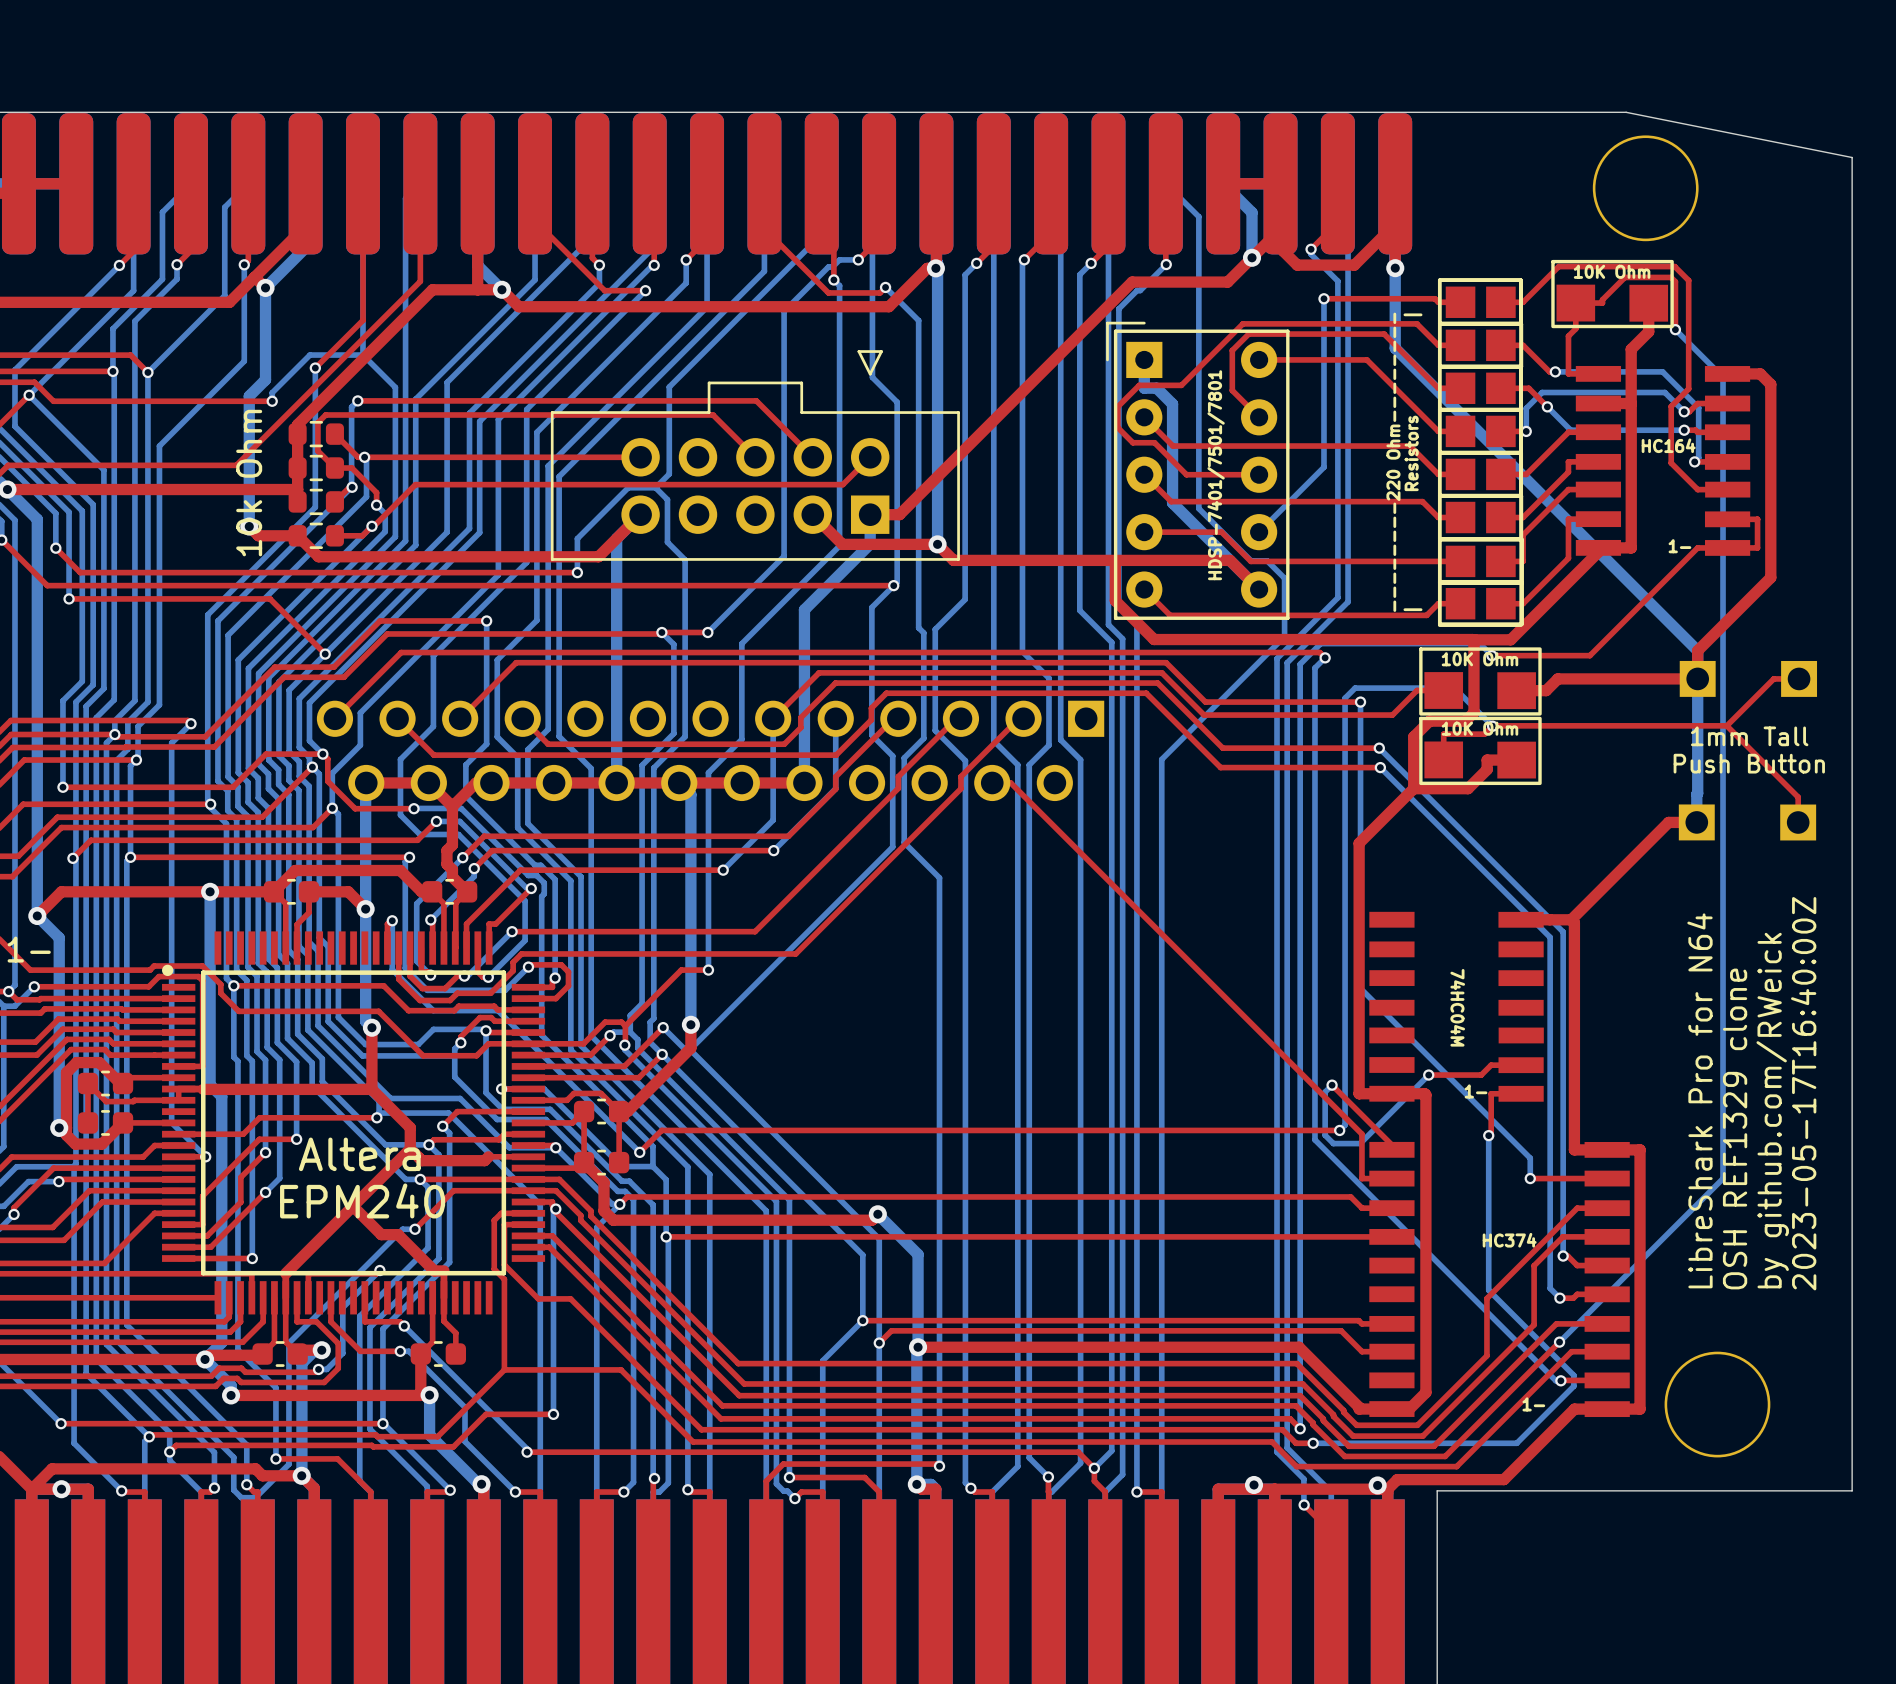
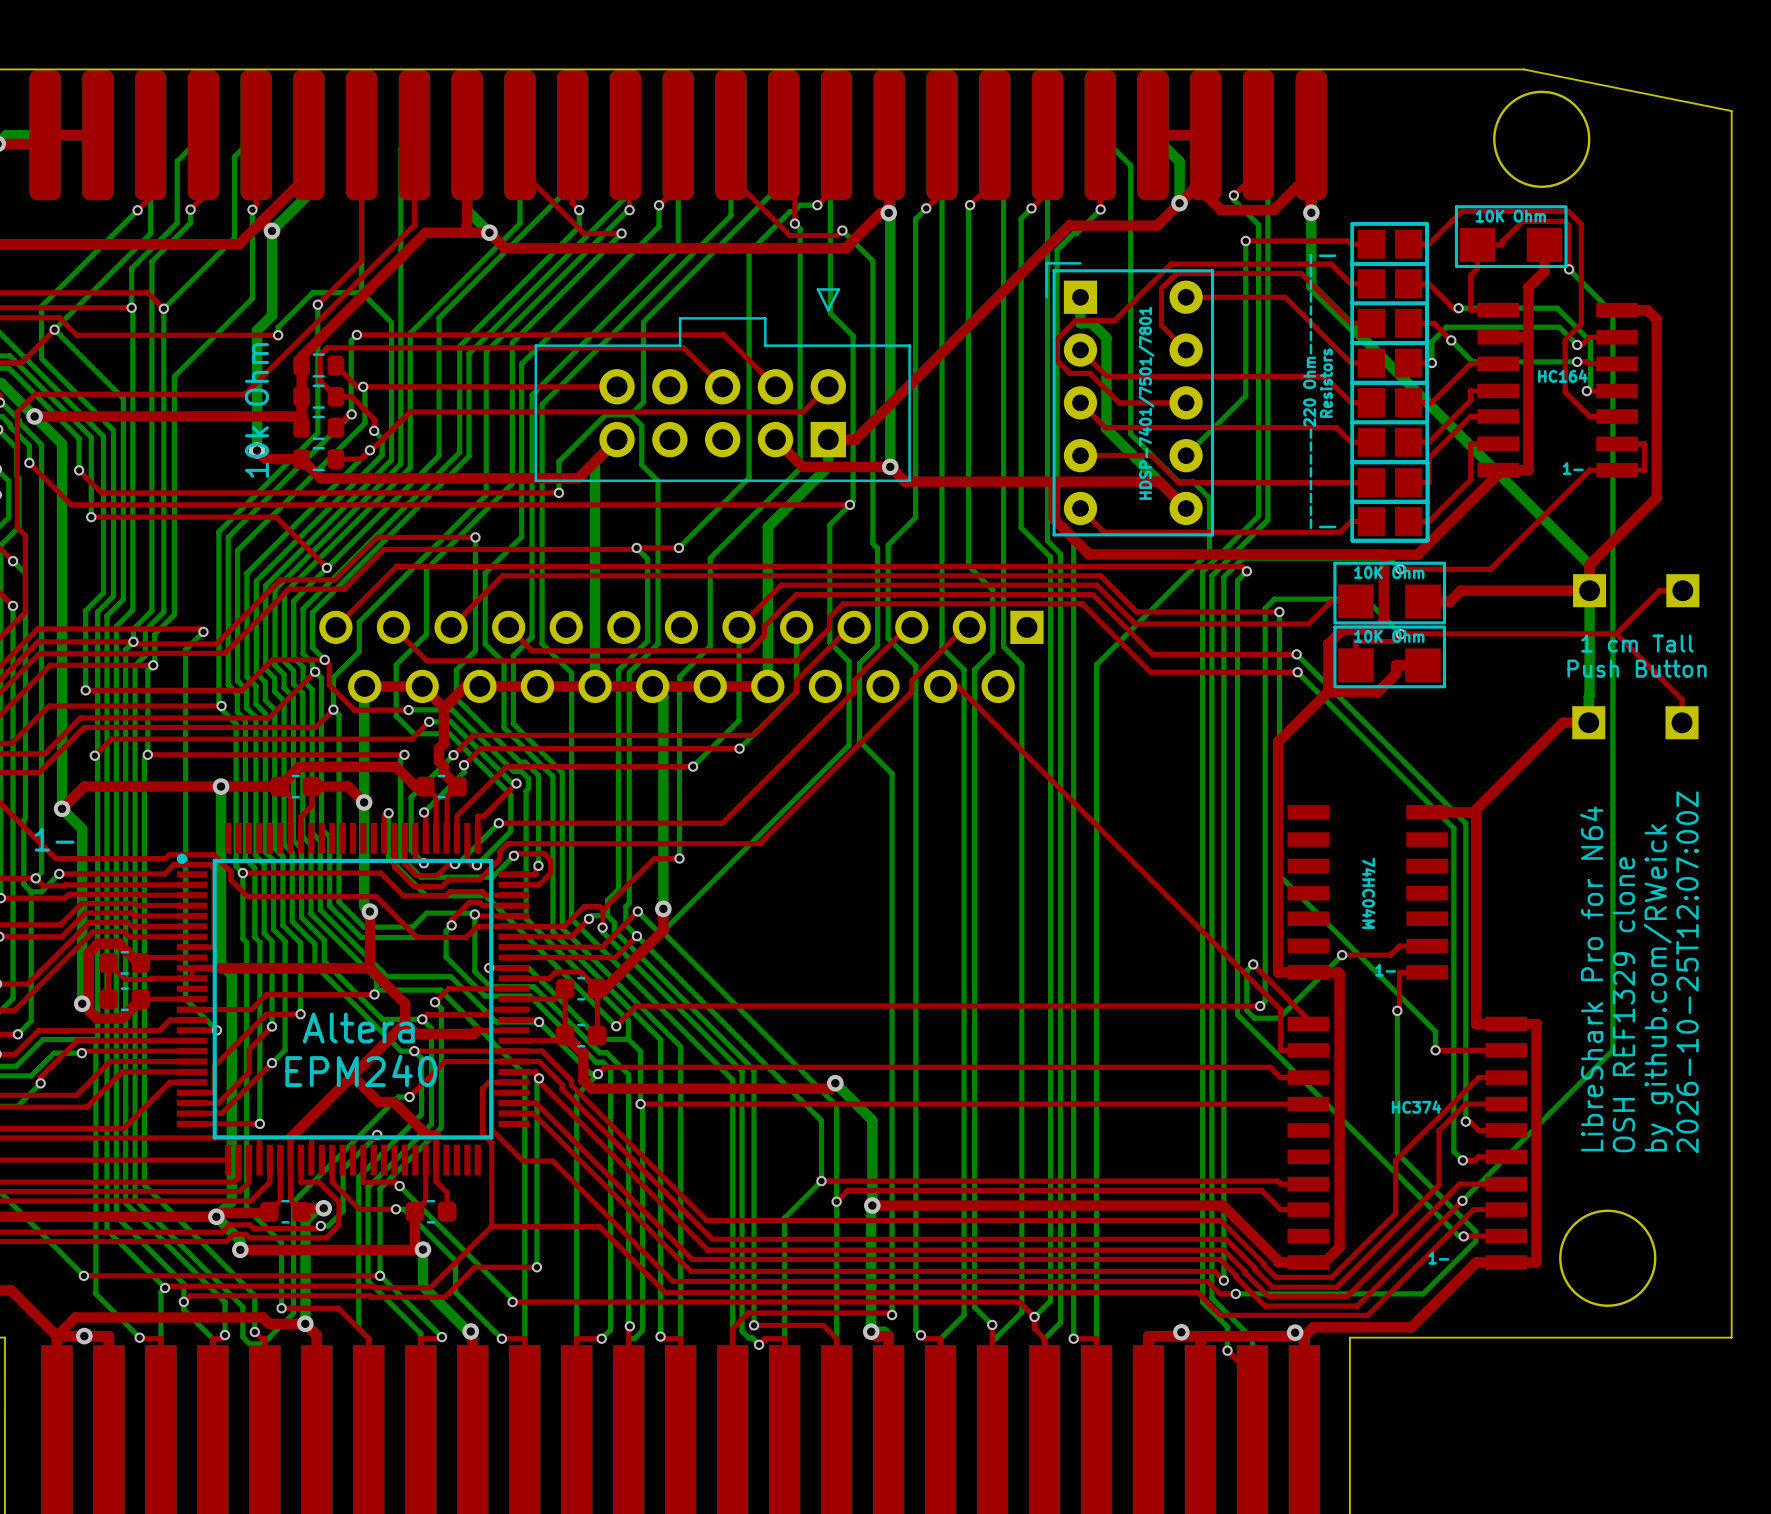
text: 1mm Tall (1749, 736) -> 1 cm Tall (1637, 643)
text: 2023-05-17T16:40:00Z (1803, 1093) -> 2026-10-25T12:07:00Z (1687, 972)

